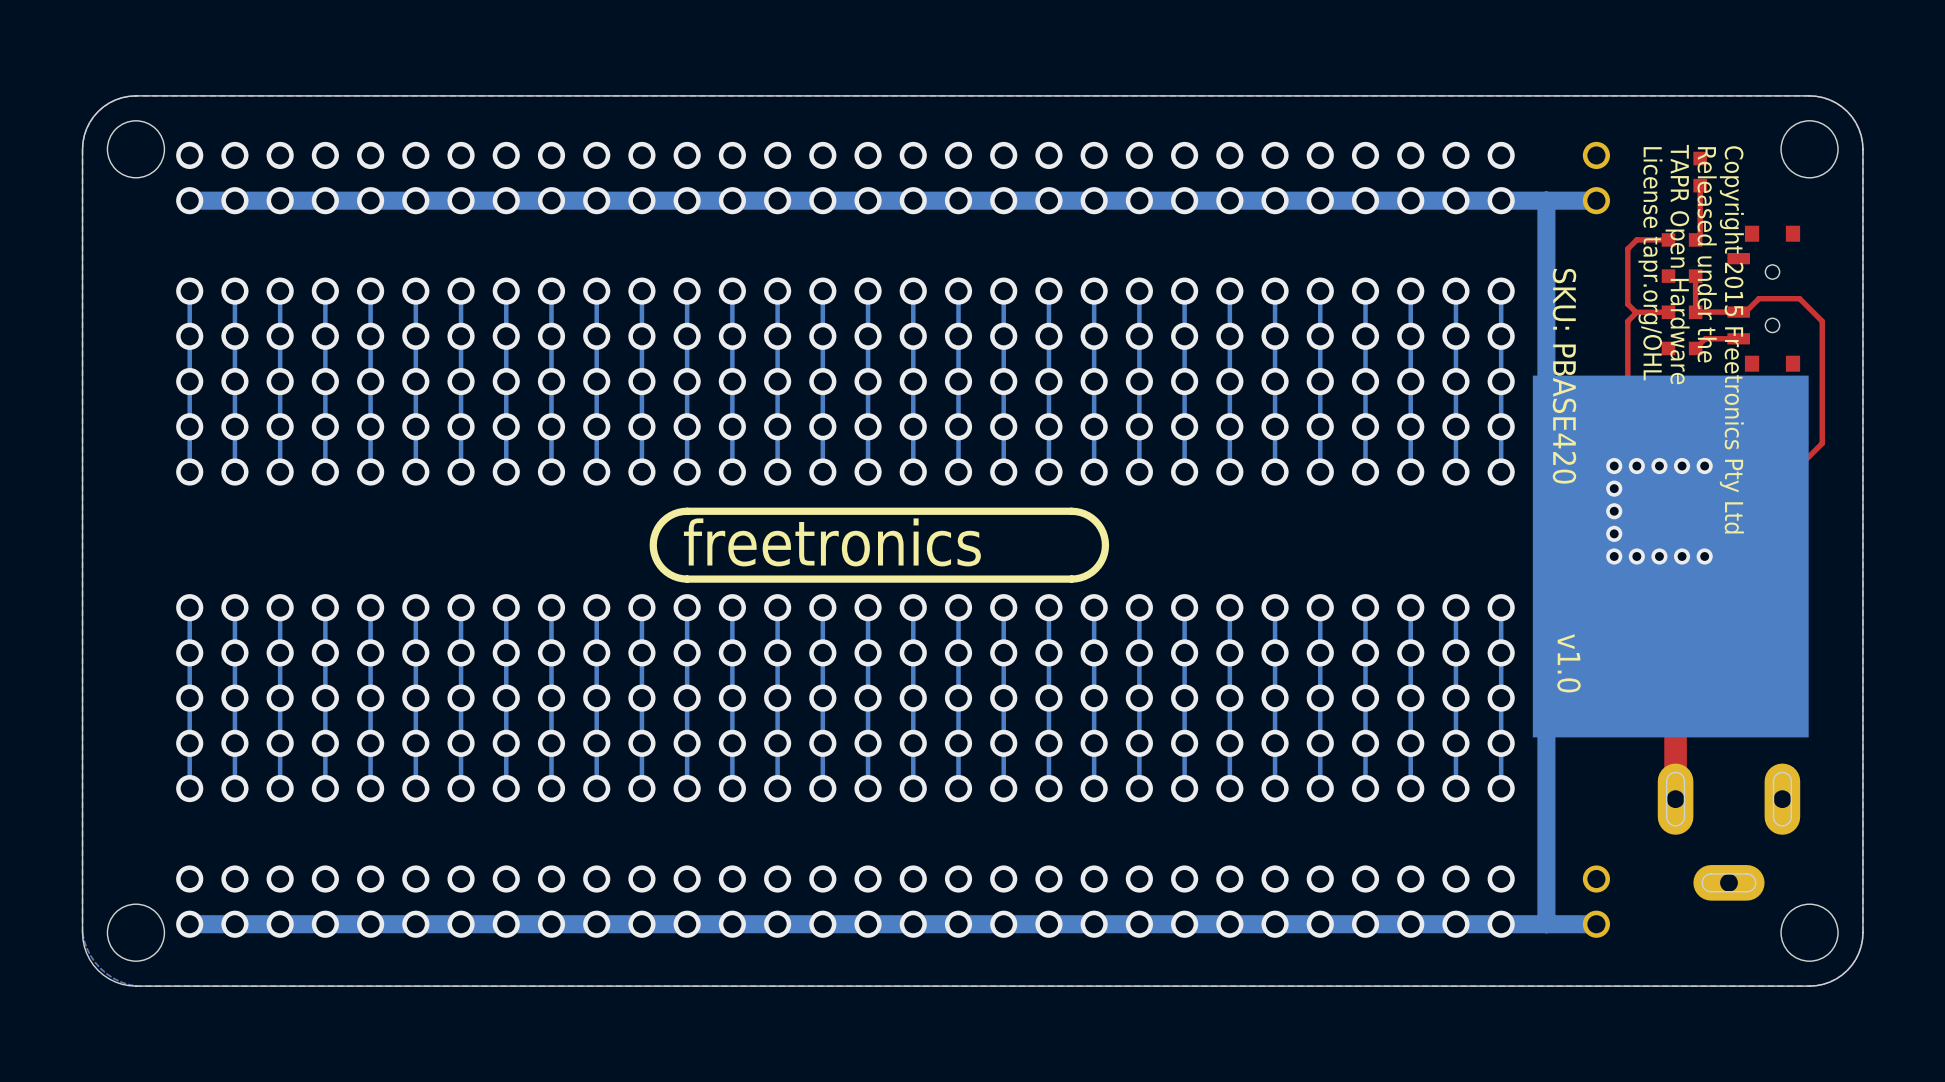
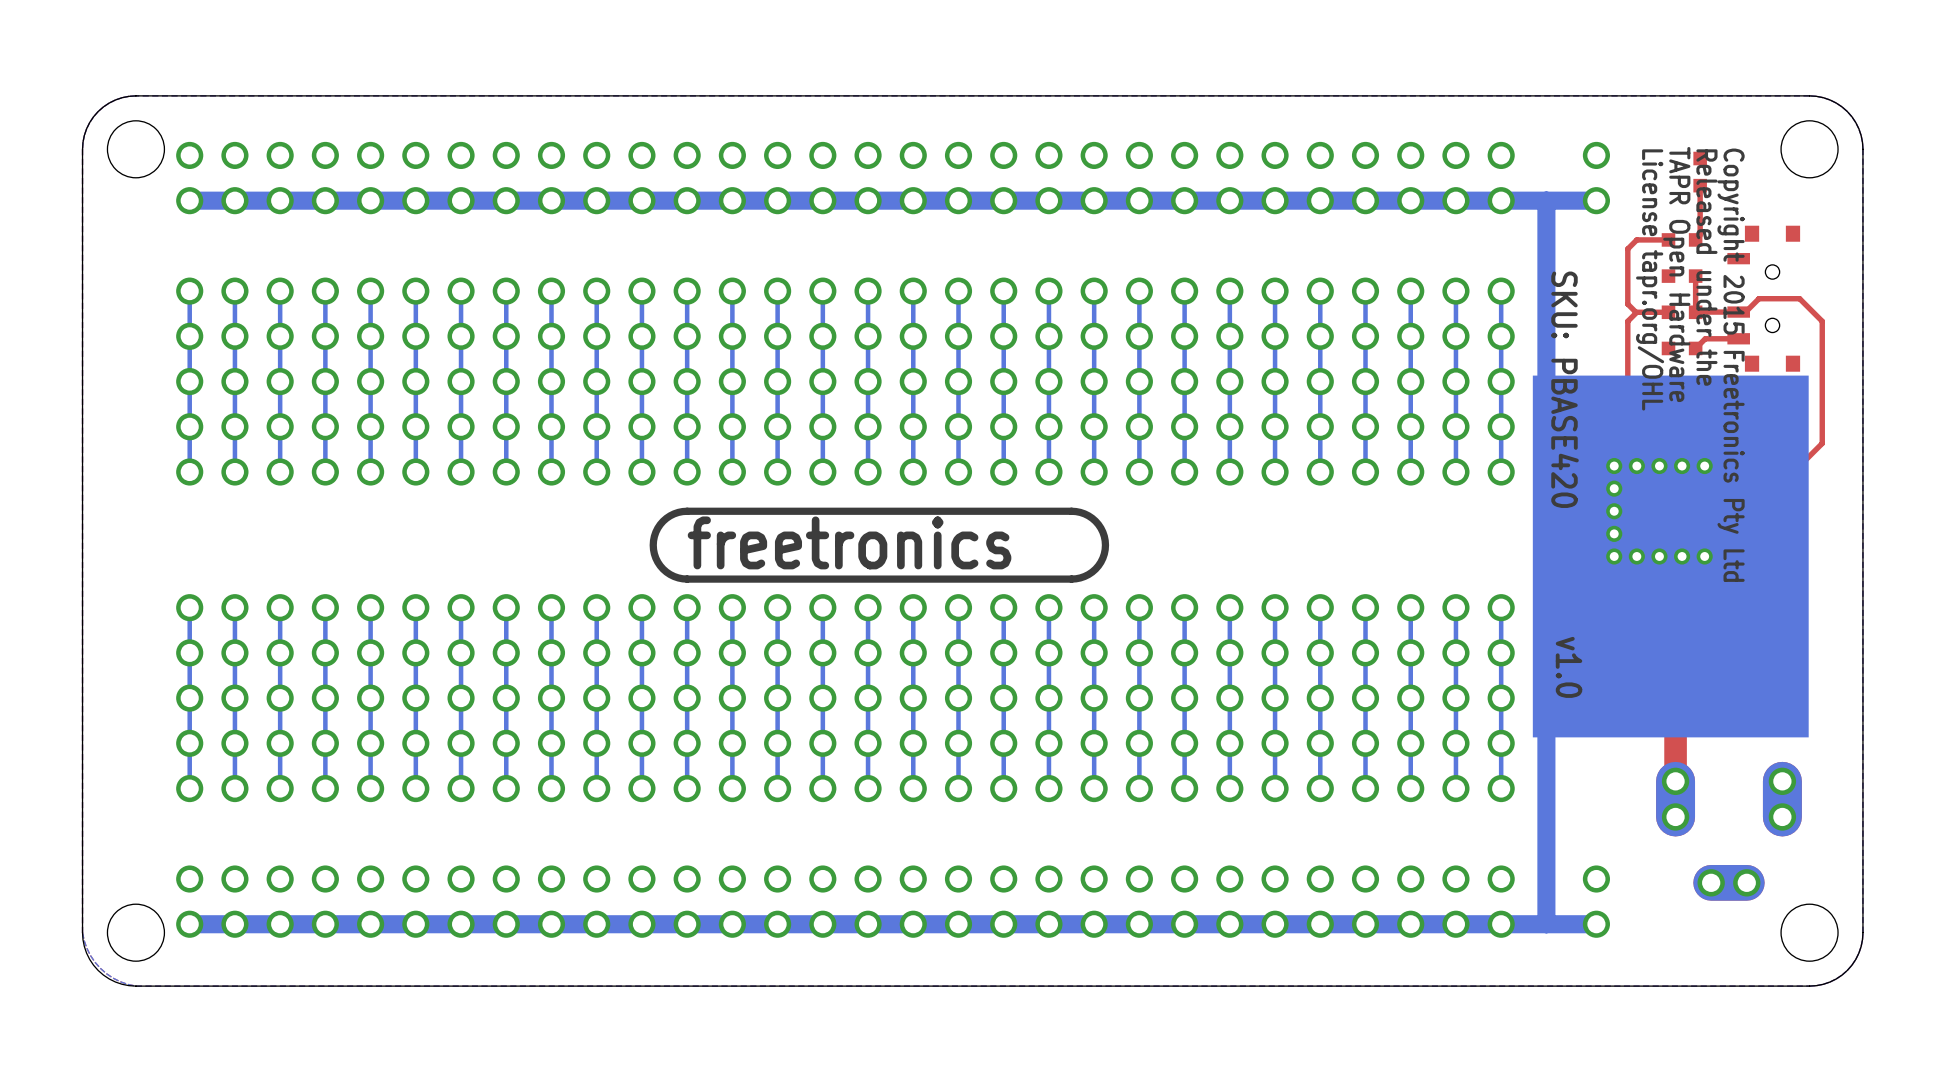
part footprint: [1657, 763, 1801, 901] -> [1656, 761, 1802, 901]

